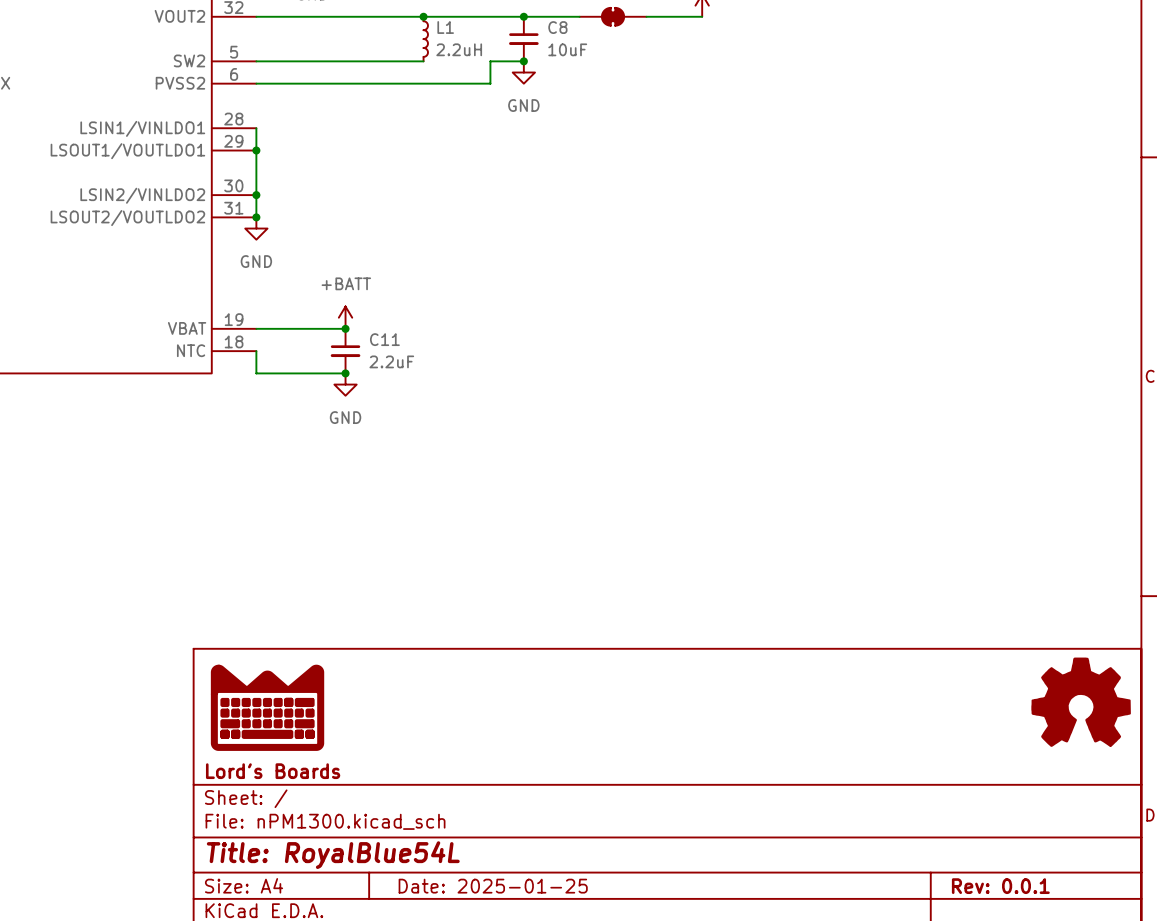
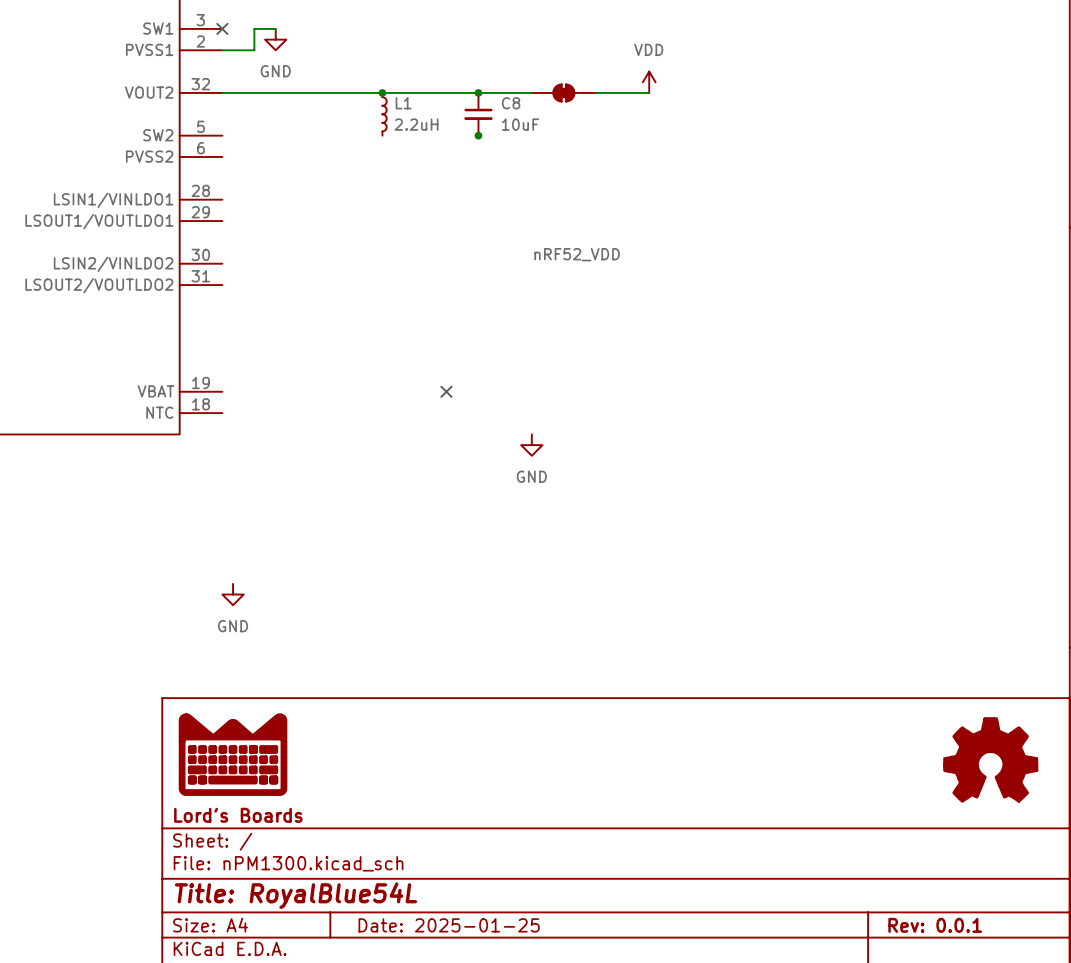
wire: (256, 61) (423, 61) -> none
wire: (523, 61) (490, 61) (490, 83) (256, 83) -> none
power symbol: GND (523, 72) -> none
wire: (256, 128) (256, 217) -> none
junction: (256, 150) -> none
label: none -> nRF52_VDD (577, 254)
junction: (256, 195) -> none
junction: (256, 217) -> none
power symbol: GND (256, 228) -> none
power symbol: +BATT (345, 317) -> none
wire: (256, 328) (345, 328) -> none
junction: (345, 328) -> none
no-connect mark: none -> (446, 391)
wire: (256, 351) (256, 373) (345, 373) -> none
C11: 2.2uF (345, 351) -> none
junction: (345, 373) -> none
power symbol: GND (345, 384) -> none
power symbol: none -> GND (531, 445)
power symbol: none -> GND (233, 594)
power symbol position: (1081, 702) -> (990, 759)

